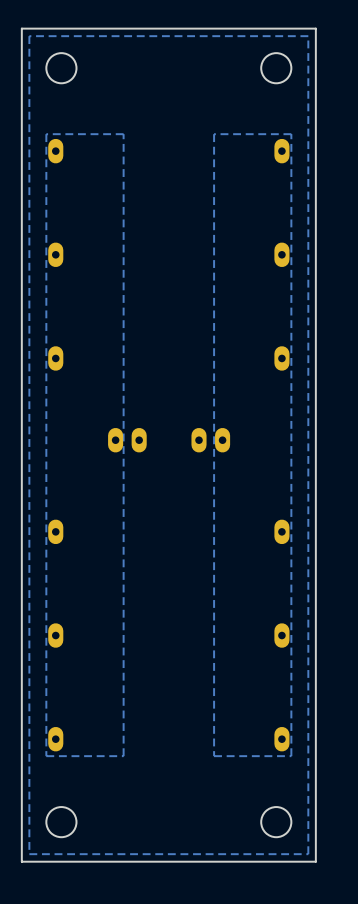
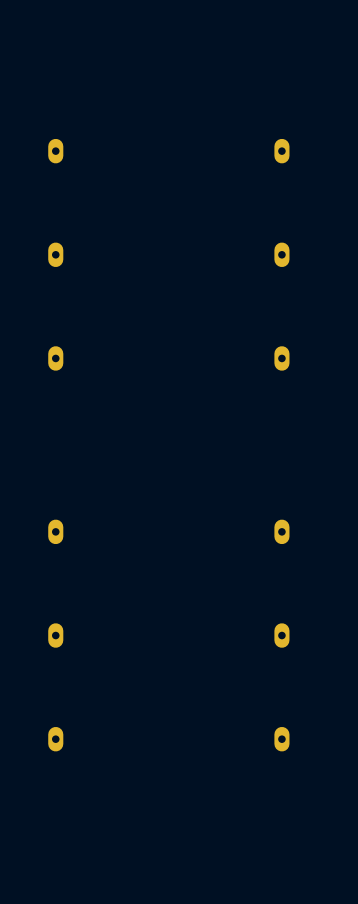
board edge: (315, 28) (21, 28) (21, 861) (315, 861) (315, 28) -> none
bottom zone outline: (308, 36) (29, 36) (29, 854) (308, 854) (308, 36) -> none
round board edge: [45, 52, 78, 85] -> none
round board edge: [260, 52, 293, 85] -> none
bottom zone outline: (123, 134) (46, 134) (46, 756) (123, 756) (123, 134) -> none
bottom zone outline: (291, 134) (214, 134) (214, 756) (291, 756) (291, 134) -> none
part: (127, 440) -> none
part: (210, 440) -> none
round board edge: [45, 806, 78, 839] -> none
round board edge: [260, 806, 293, 839] -> none

